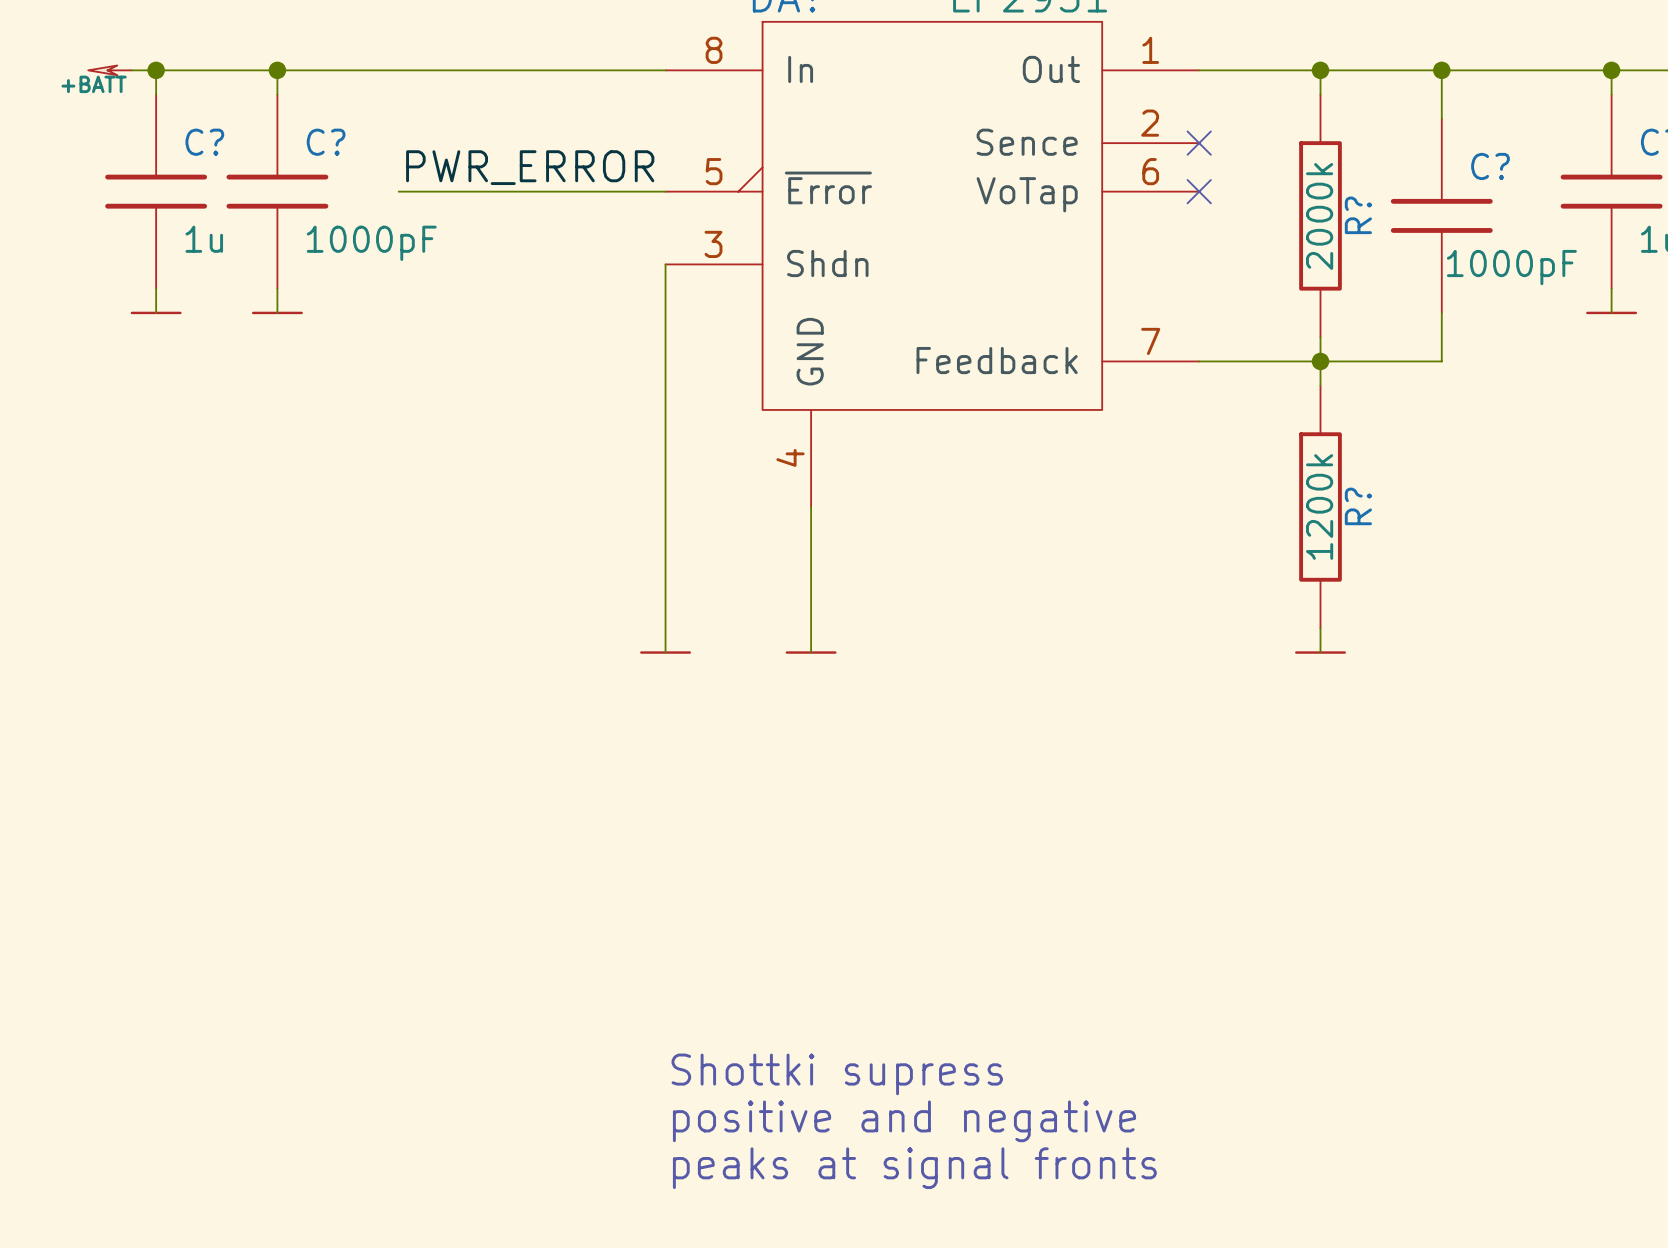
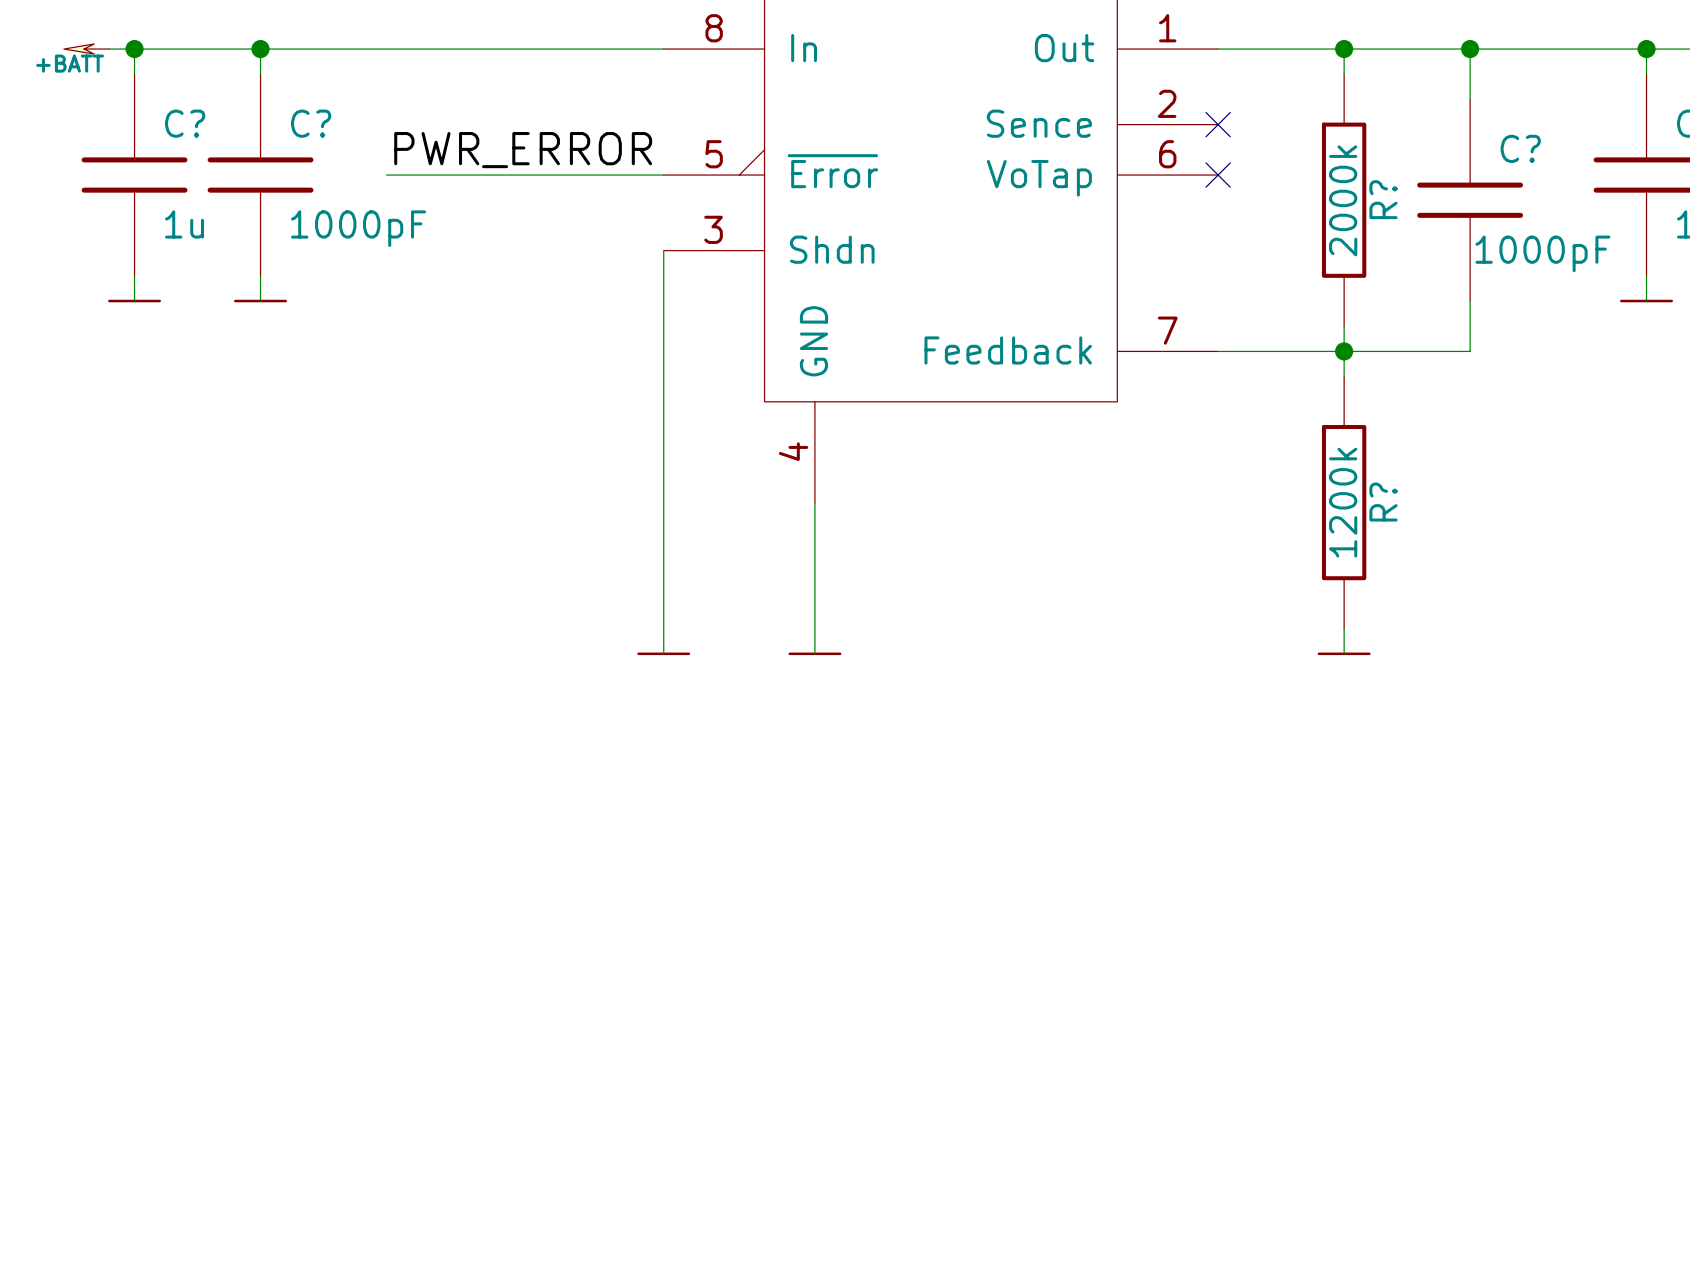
text: Shottki supress (837, 1074) -> none
text: positive and negative (904, 1121) -> none
text: peaks at signal fronts (914, 1168) -> none

